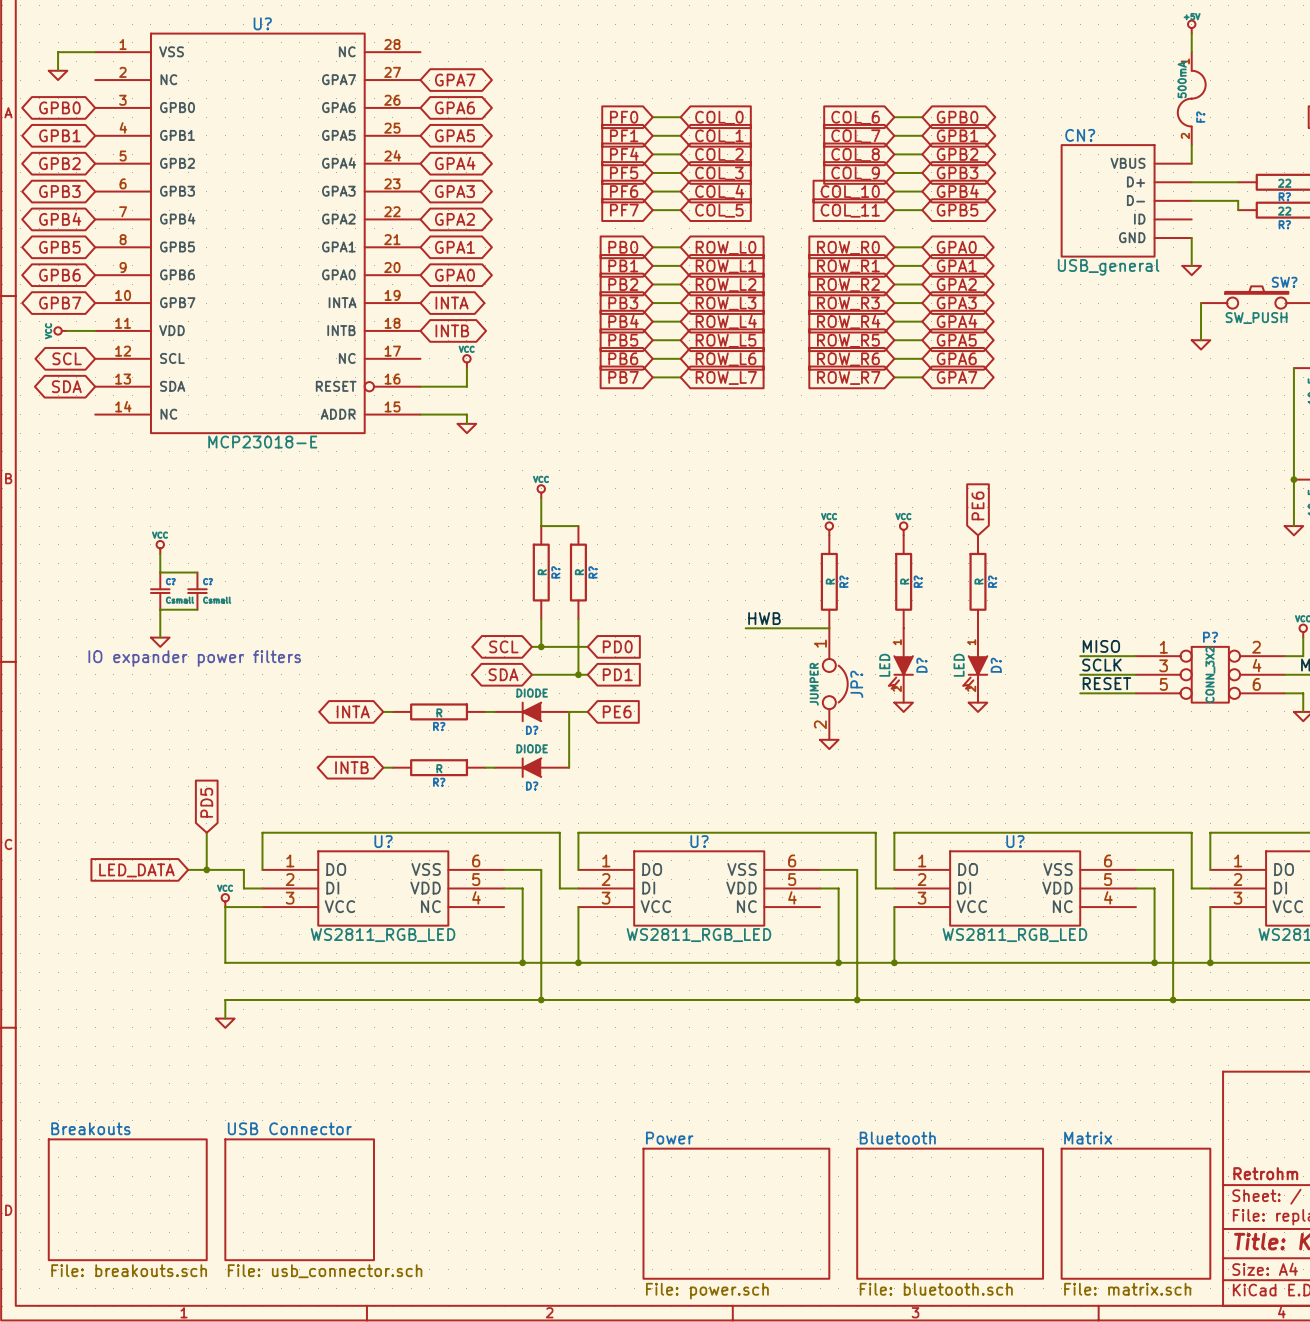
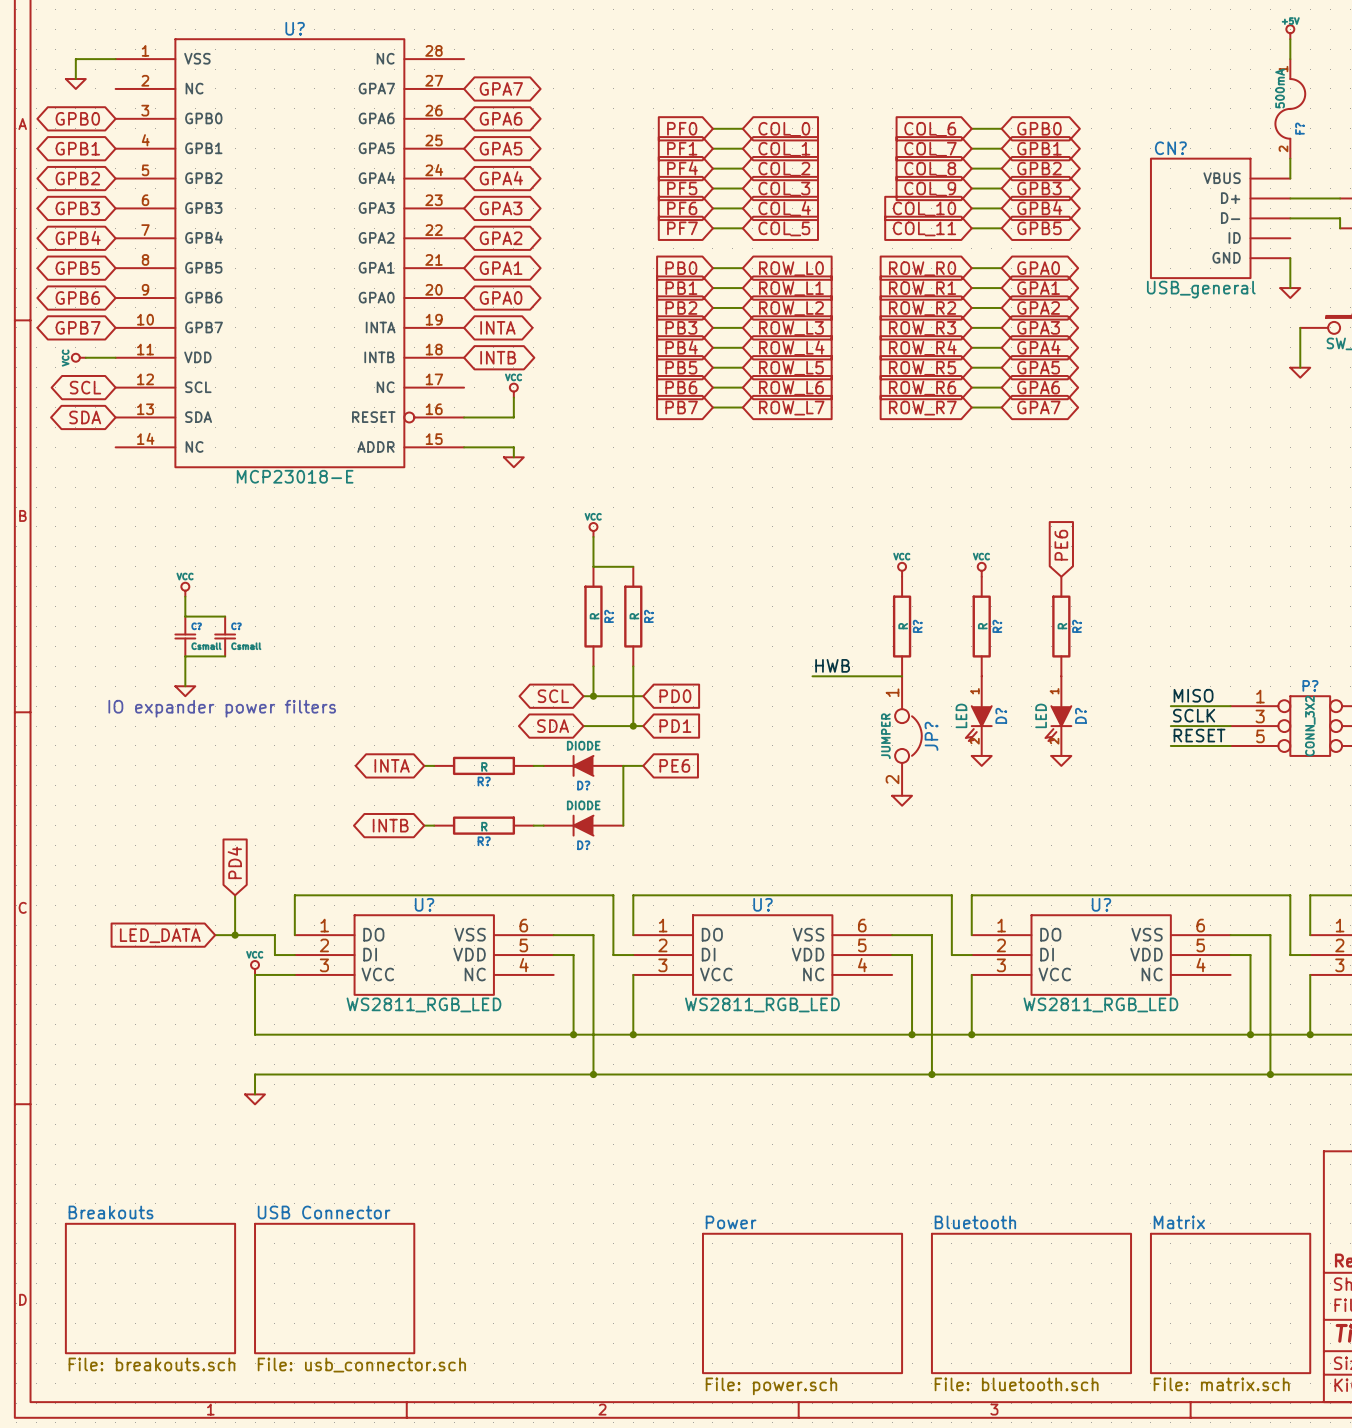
global label: PD5 (206, 802) -> PD4 (234, 862)

